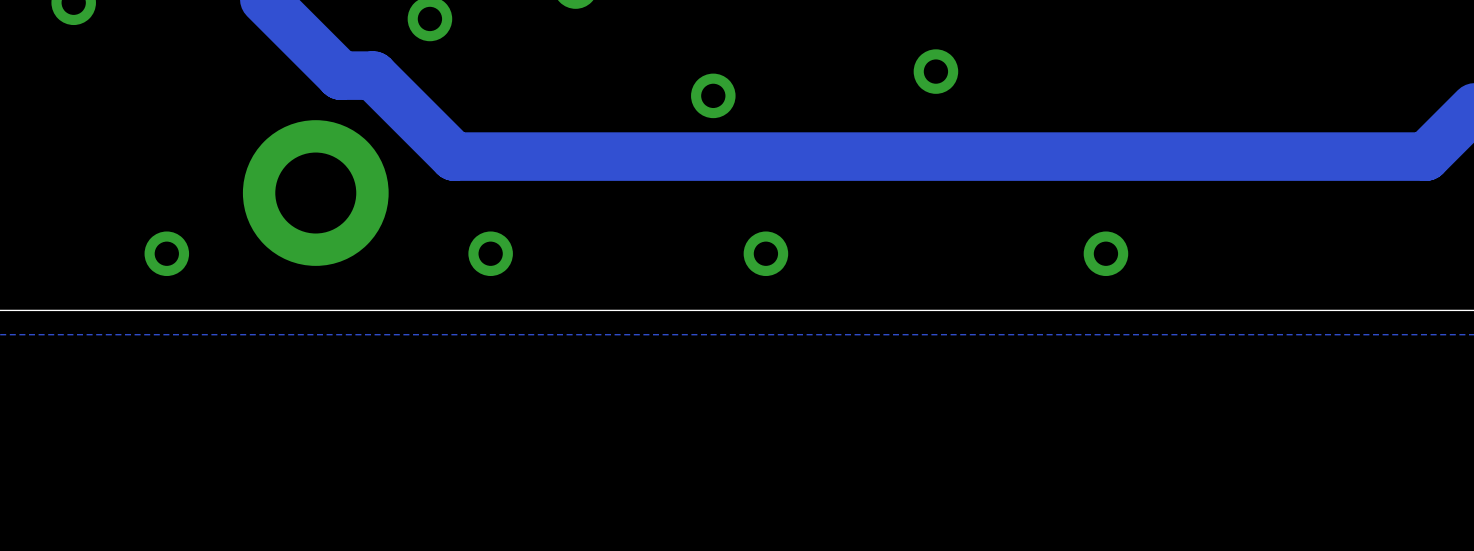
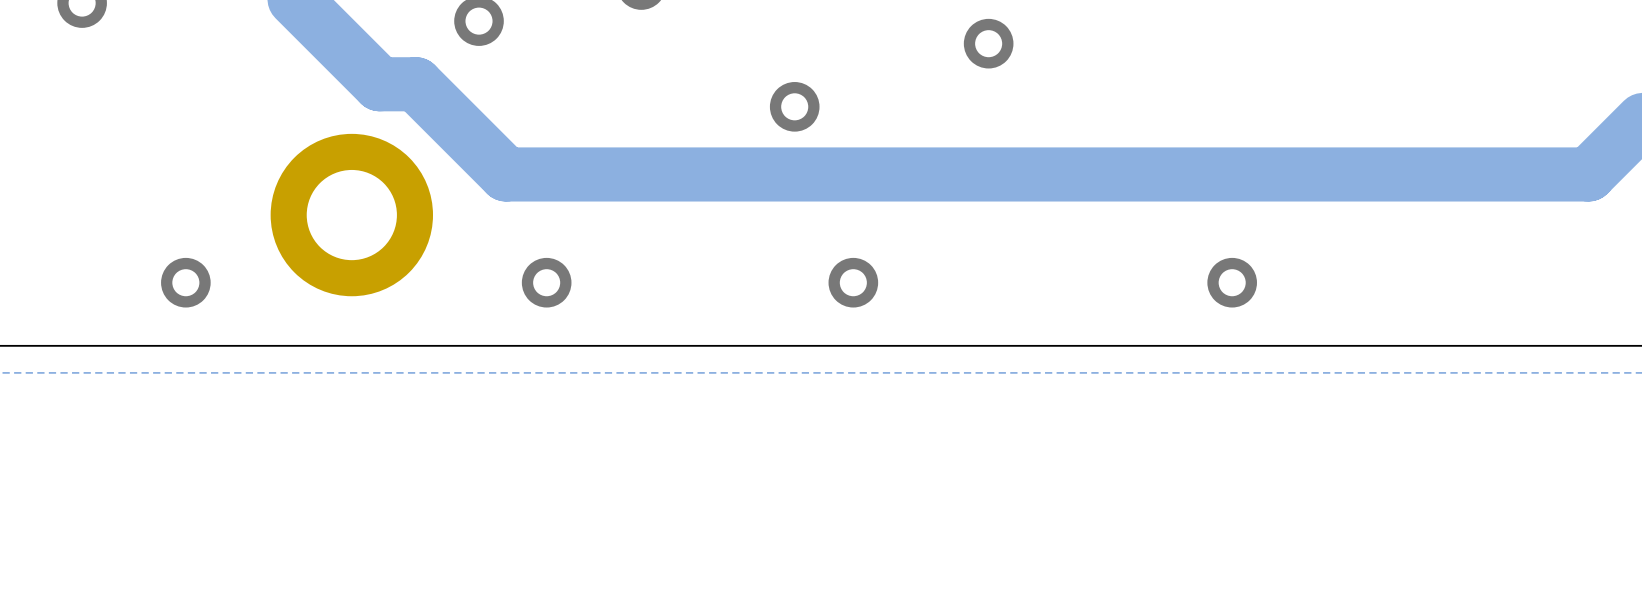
via: none -> (988, 43)
via: (935, 71) -> none

